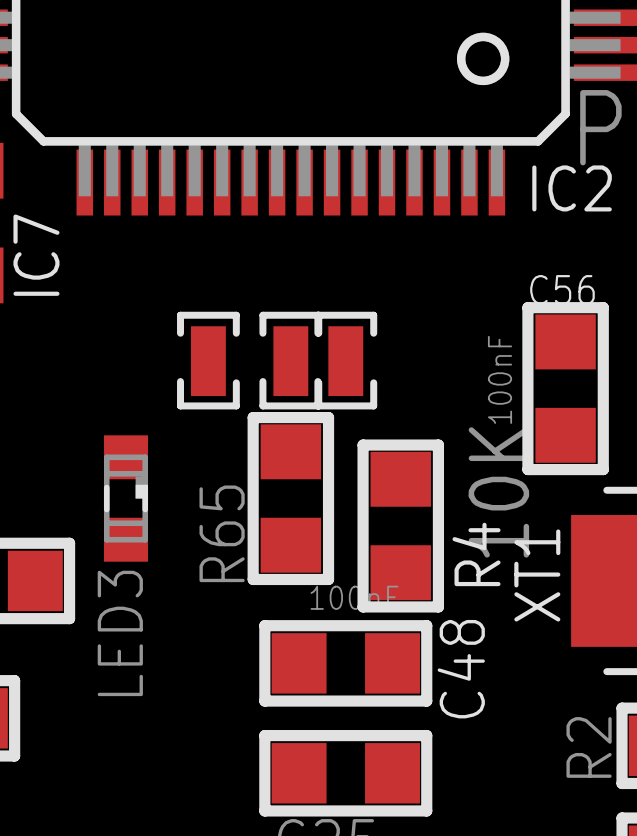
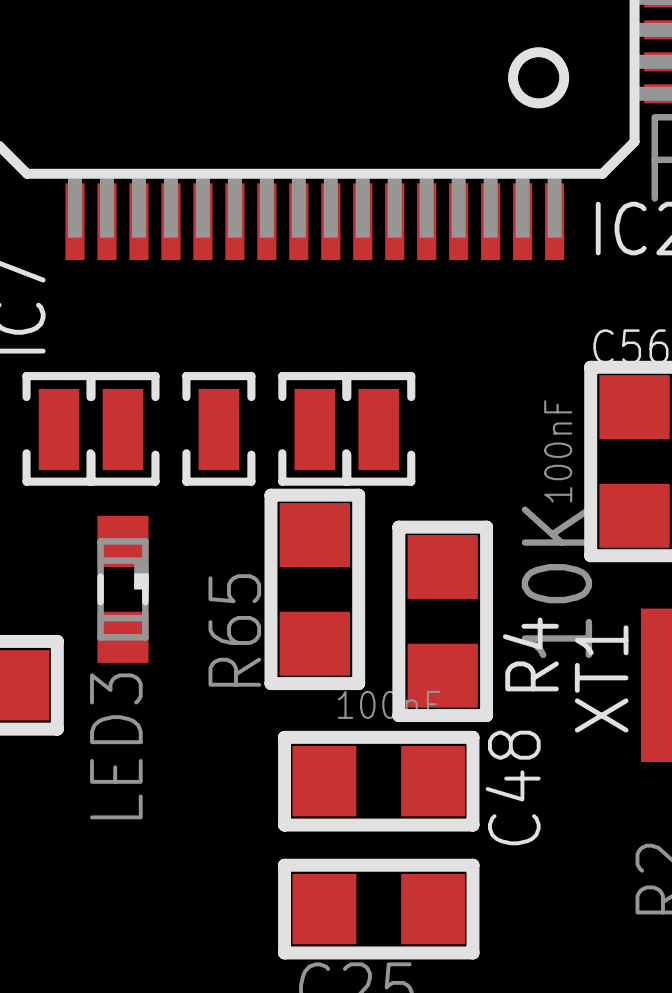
part: none -> (59, 428)
part: none -> (122, 428)

